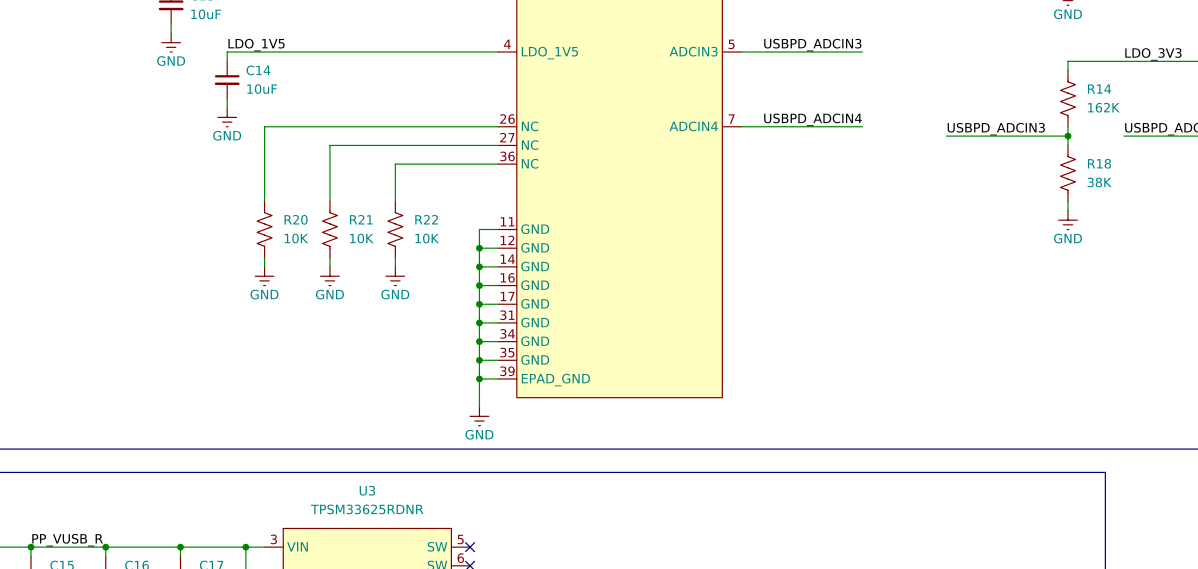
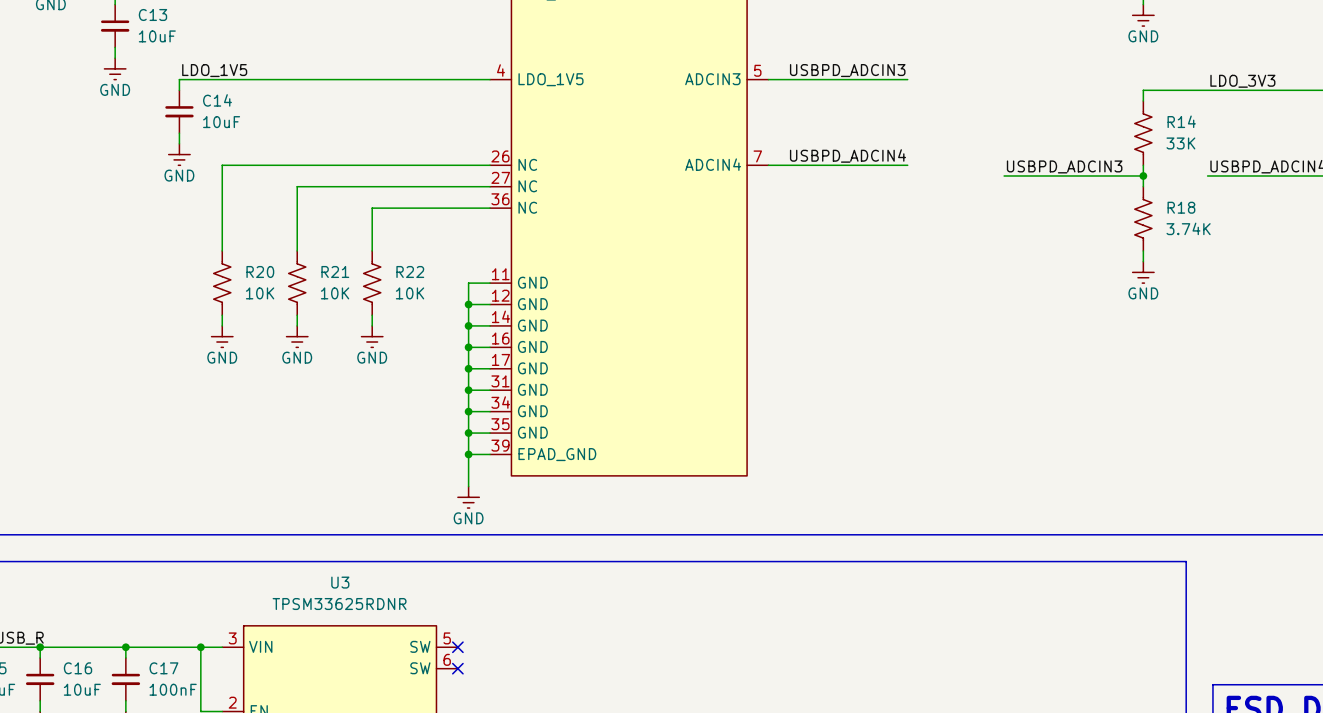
R14 value: 162K (1103, 107) -> 33K (1180, 143)
R18 value: 38K (1099, 182) -> 3.74K (1188, 228)

